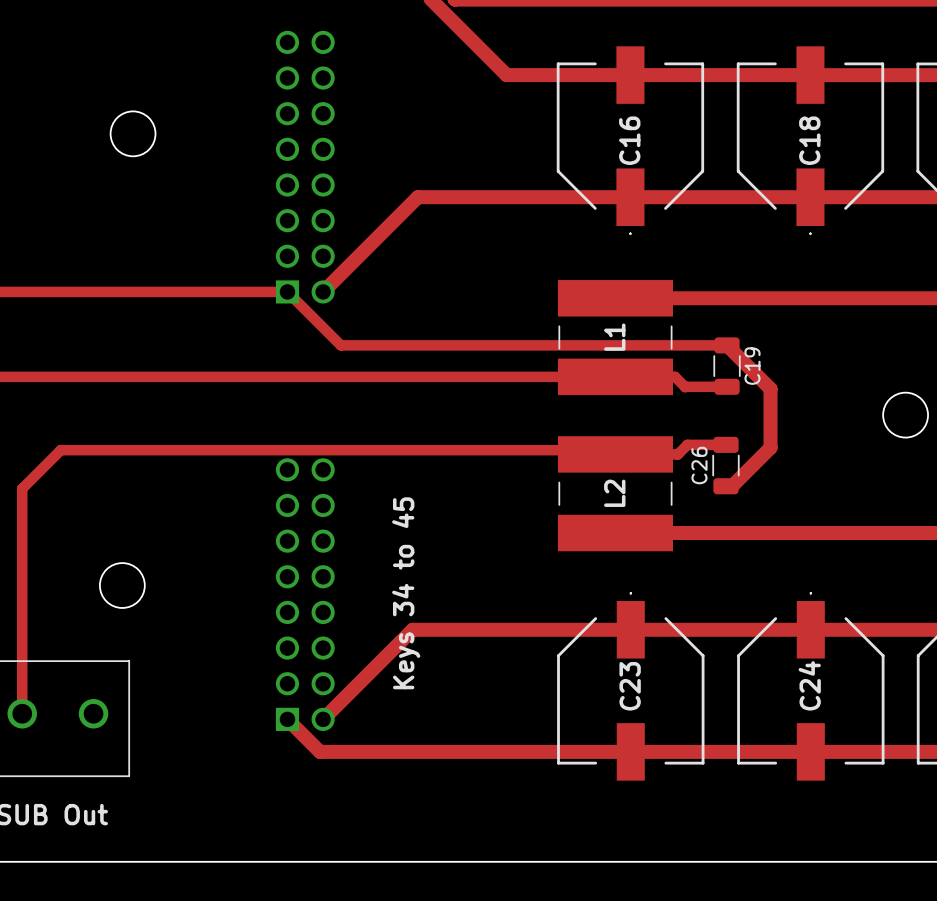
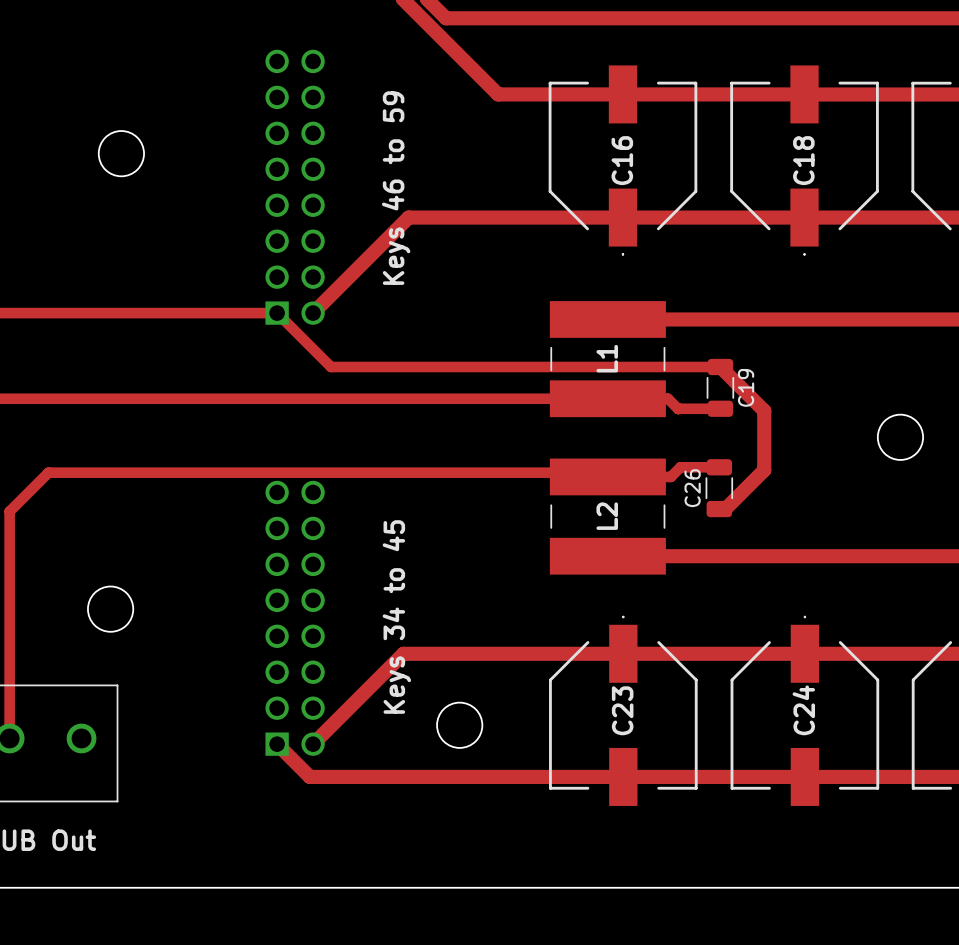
part value: none -> Keys 46 to 59 (396, 188)
round board edge: none -> [436, 701, 484, 749]

